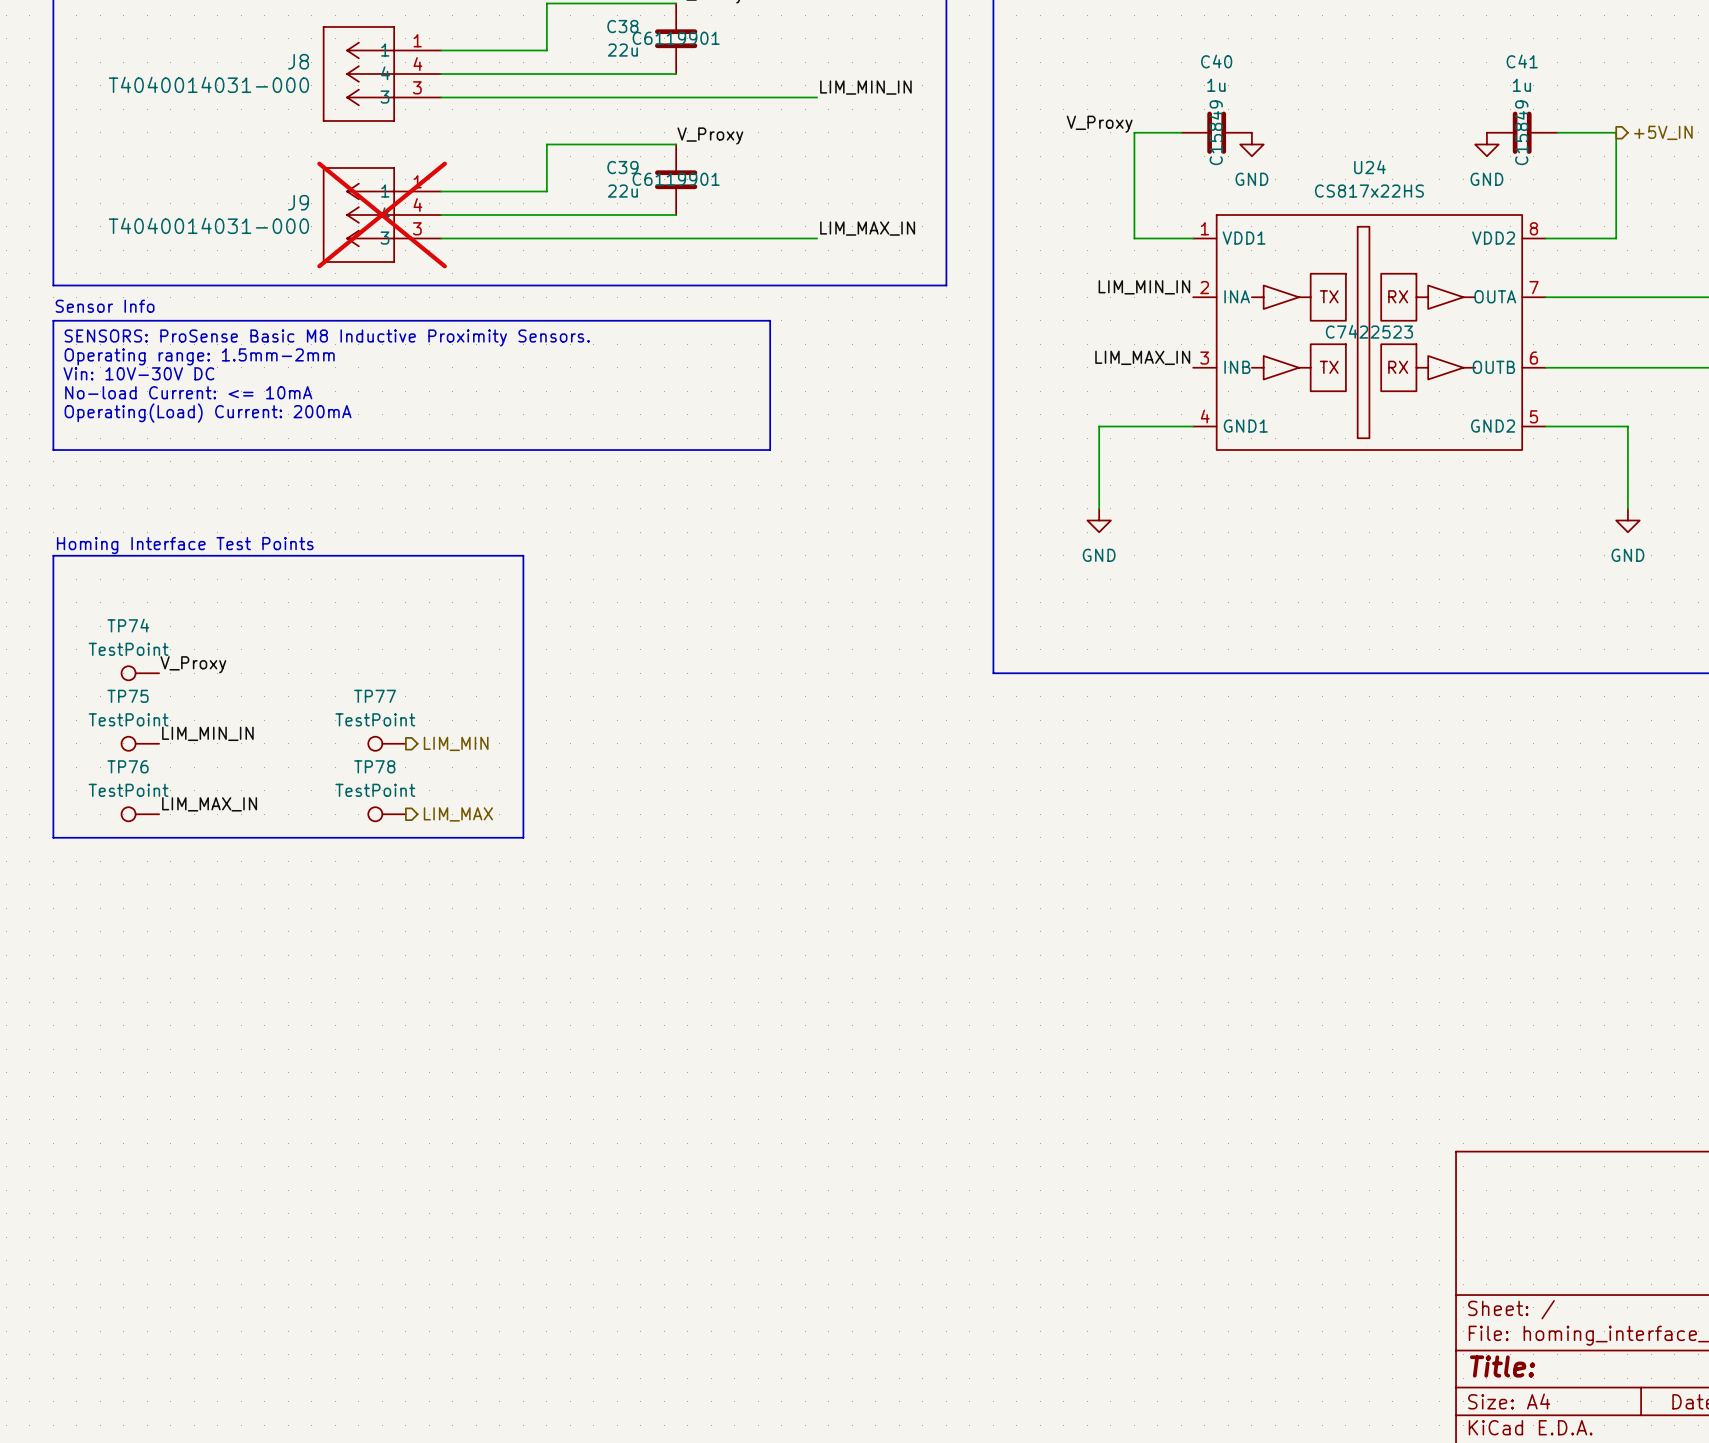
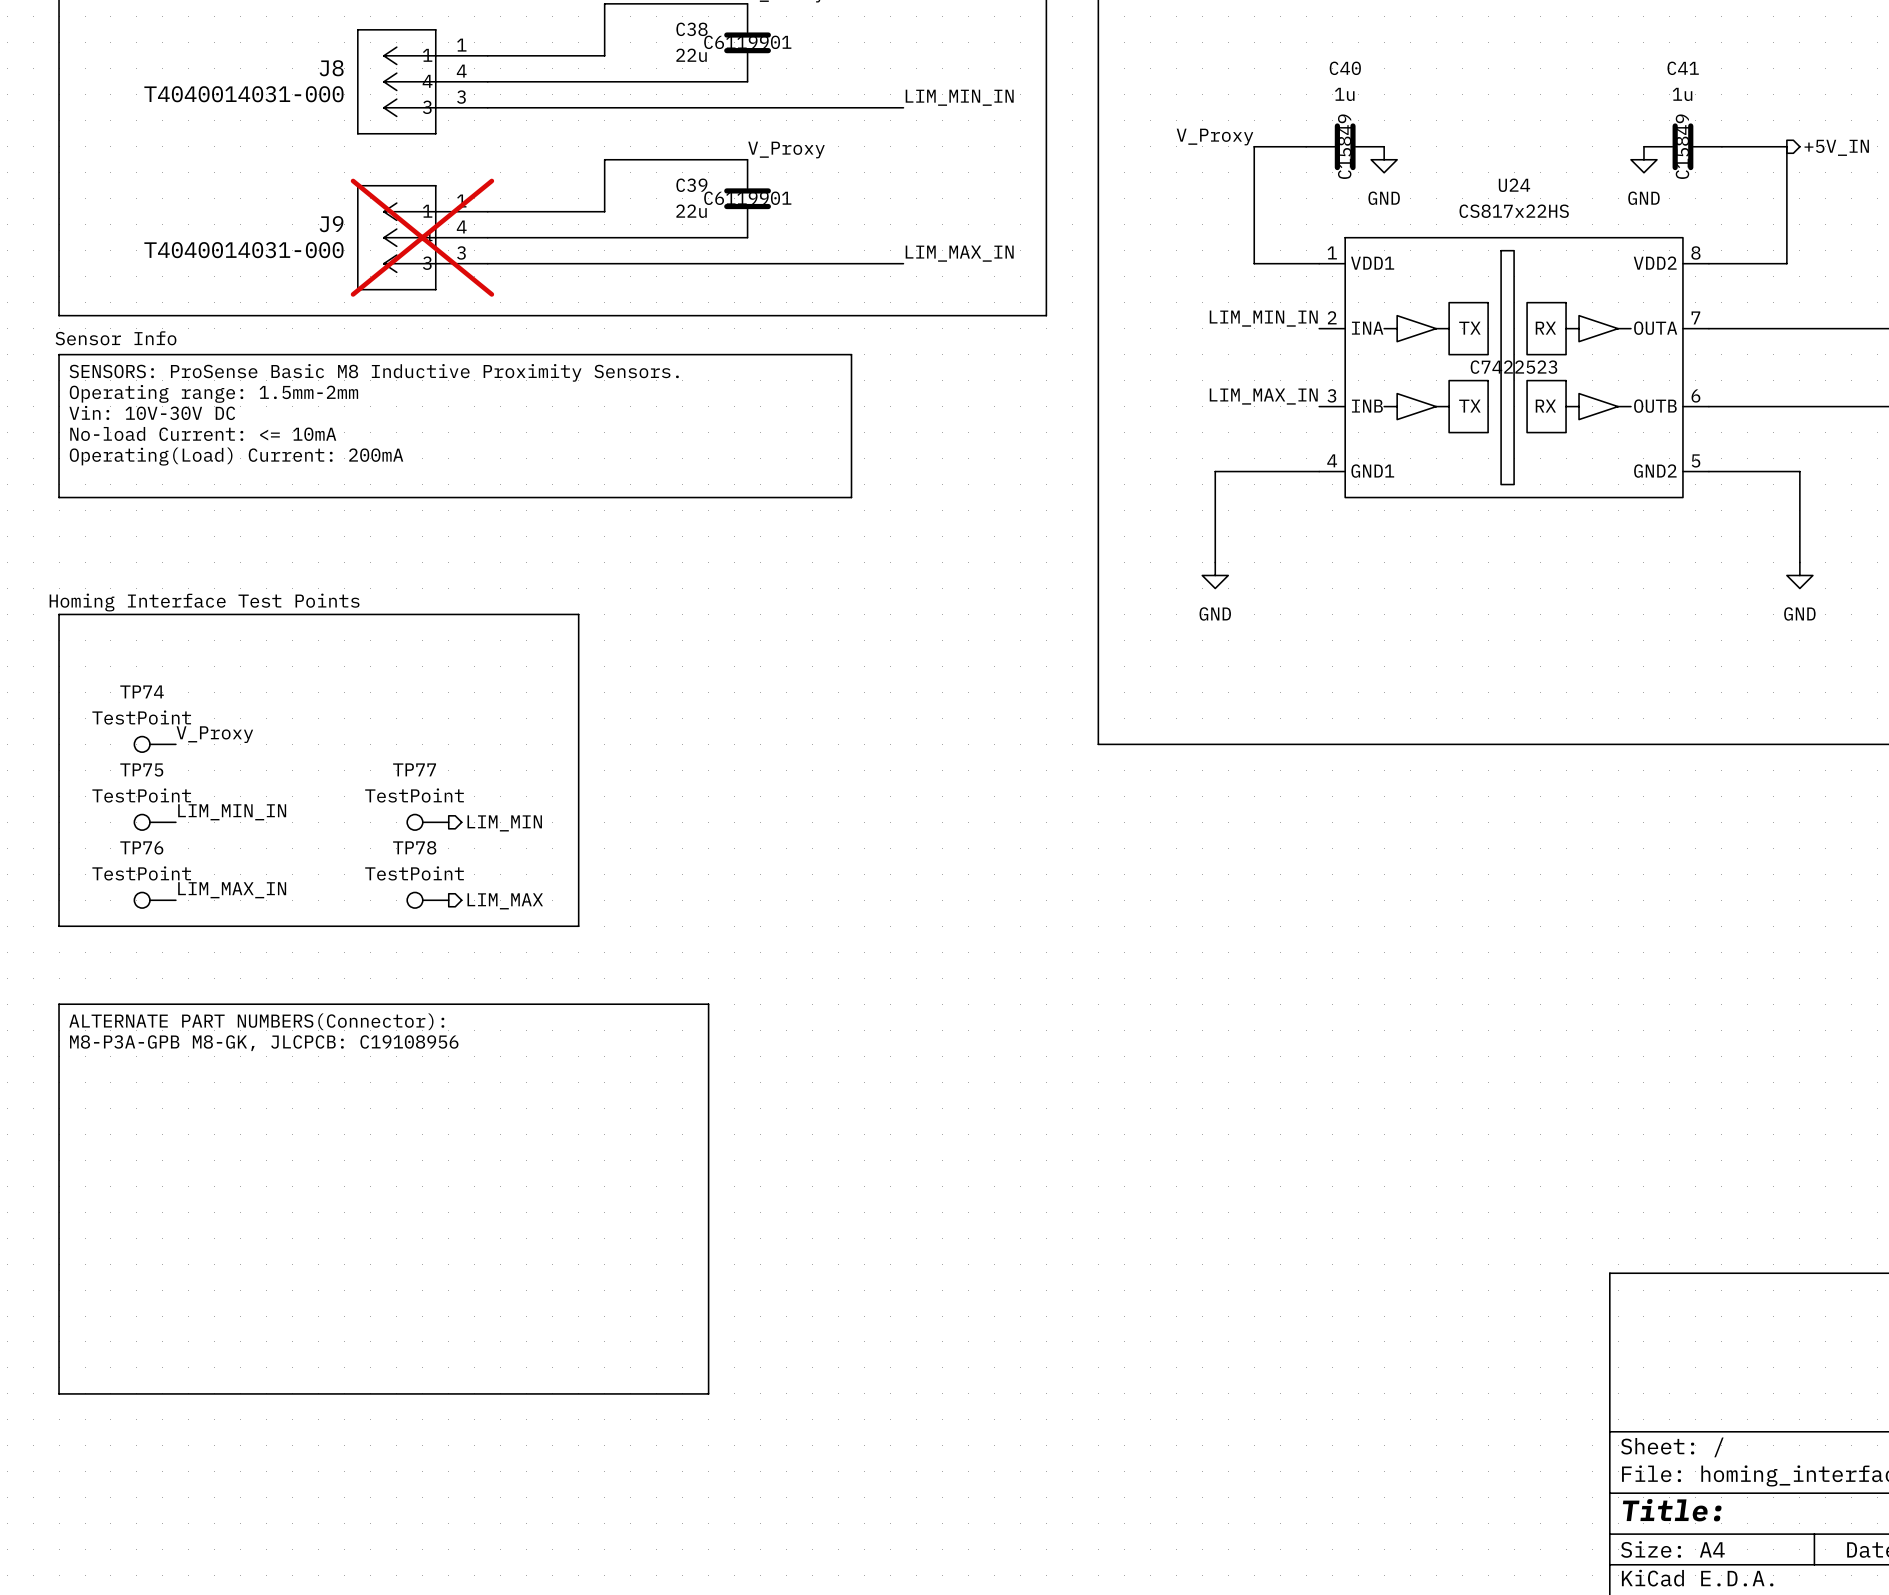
line: none -> (59, 1004) (708, 1004) (708, 1393) (59, 1393) (59, 1004)
text: none -> ALTERNATE PART NUMBERS(Connector): (256, 1021)
text: none -> M8-P3A-GPB M8-GK, JLCPCB: C19108956 (264, 1043)

